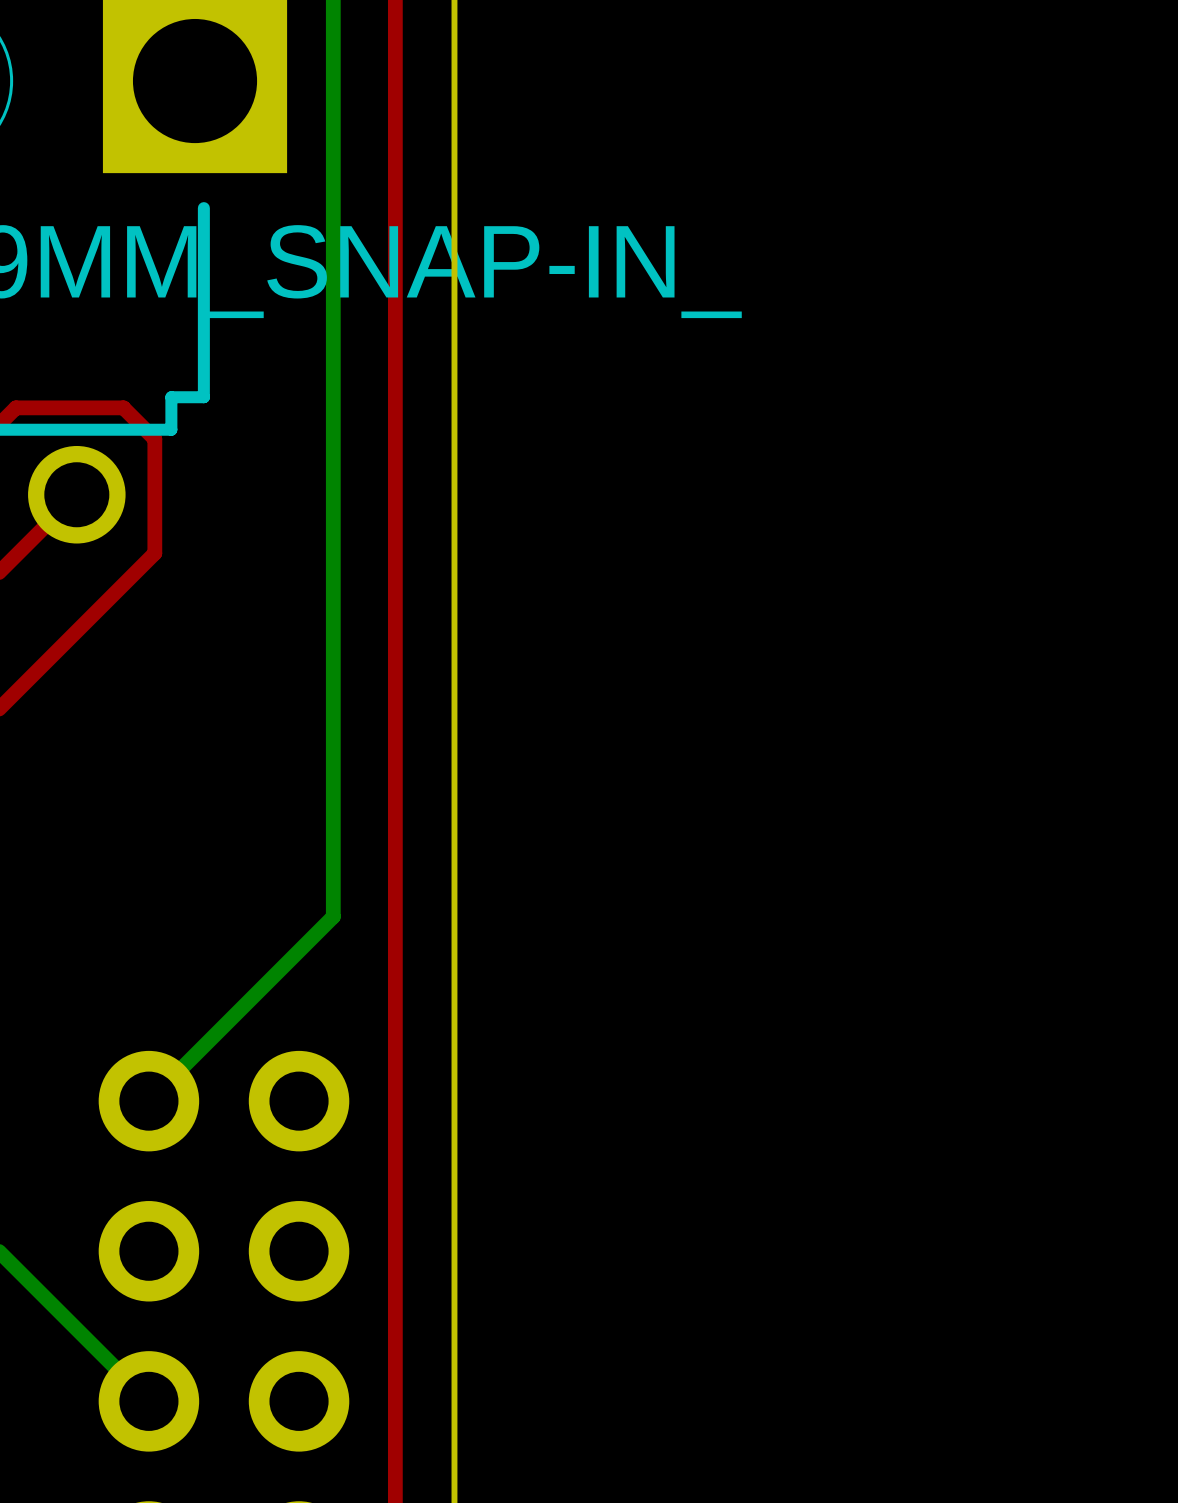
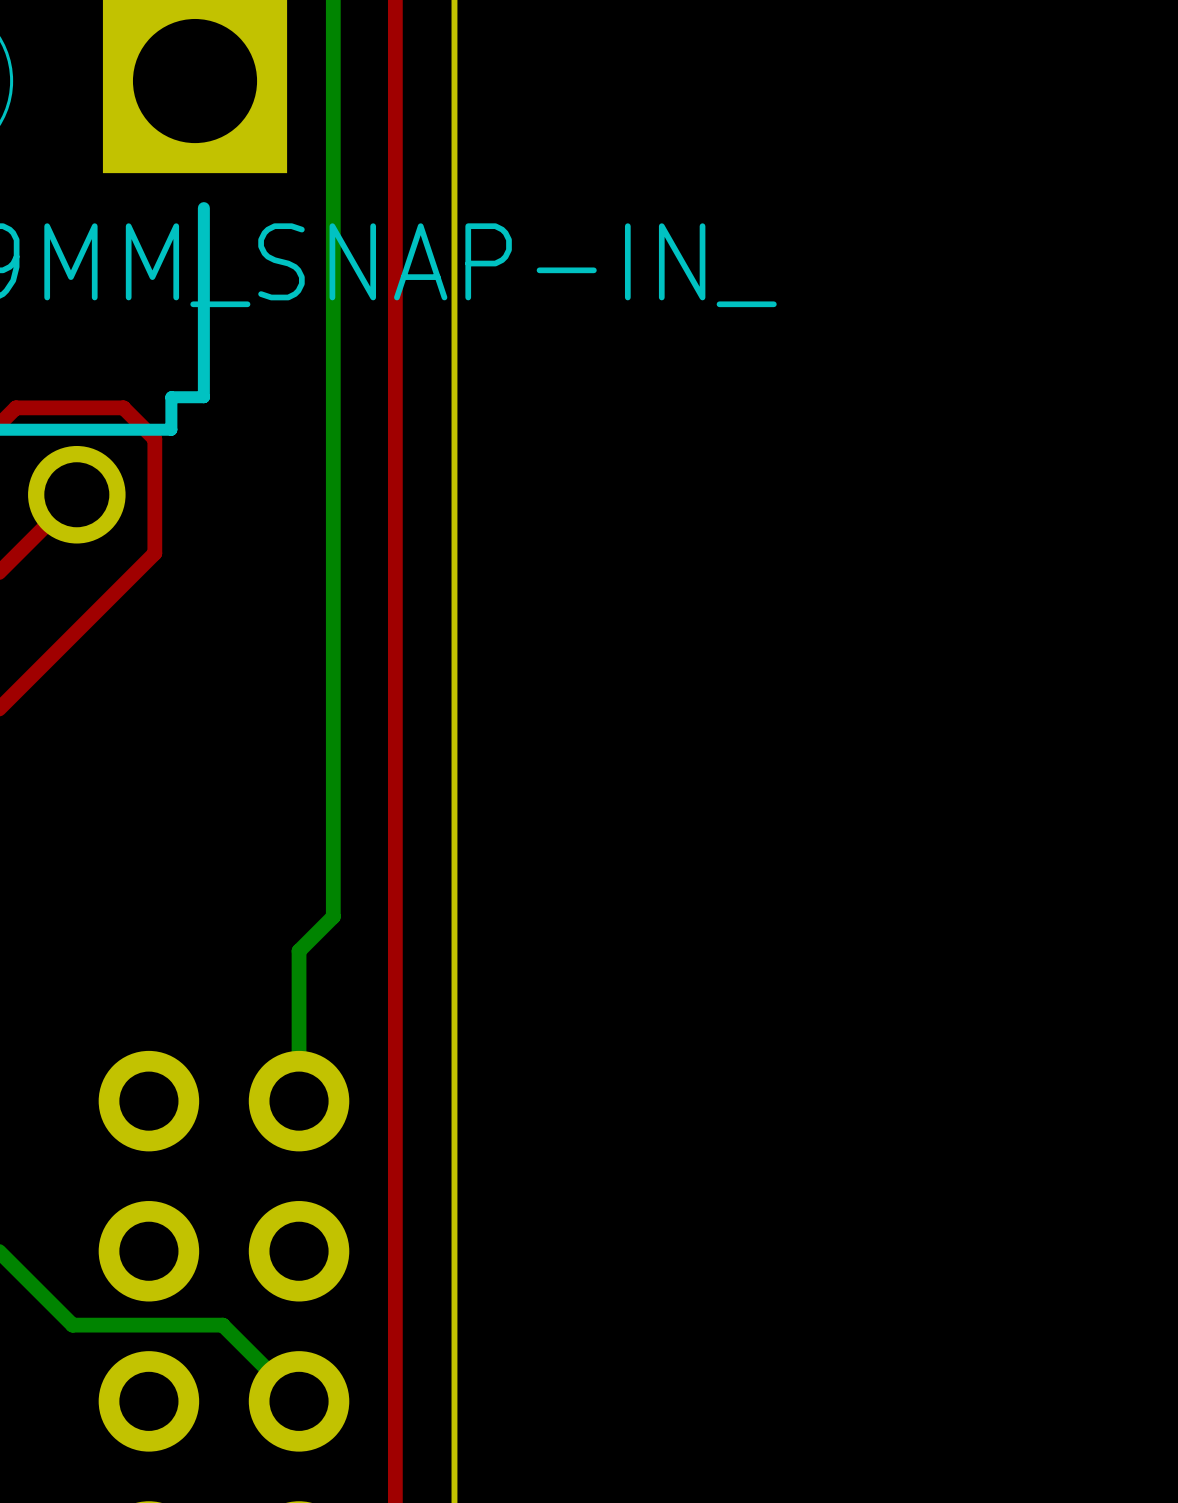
bottom track: (299, 951) (148, 1101) -> (299, 951) (299, 1101)
bottom track: (72, 1325) (148, 1401) -> (72, 1325) (222, 1325) (299, 1401)

